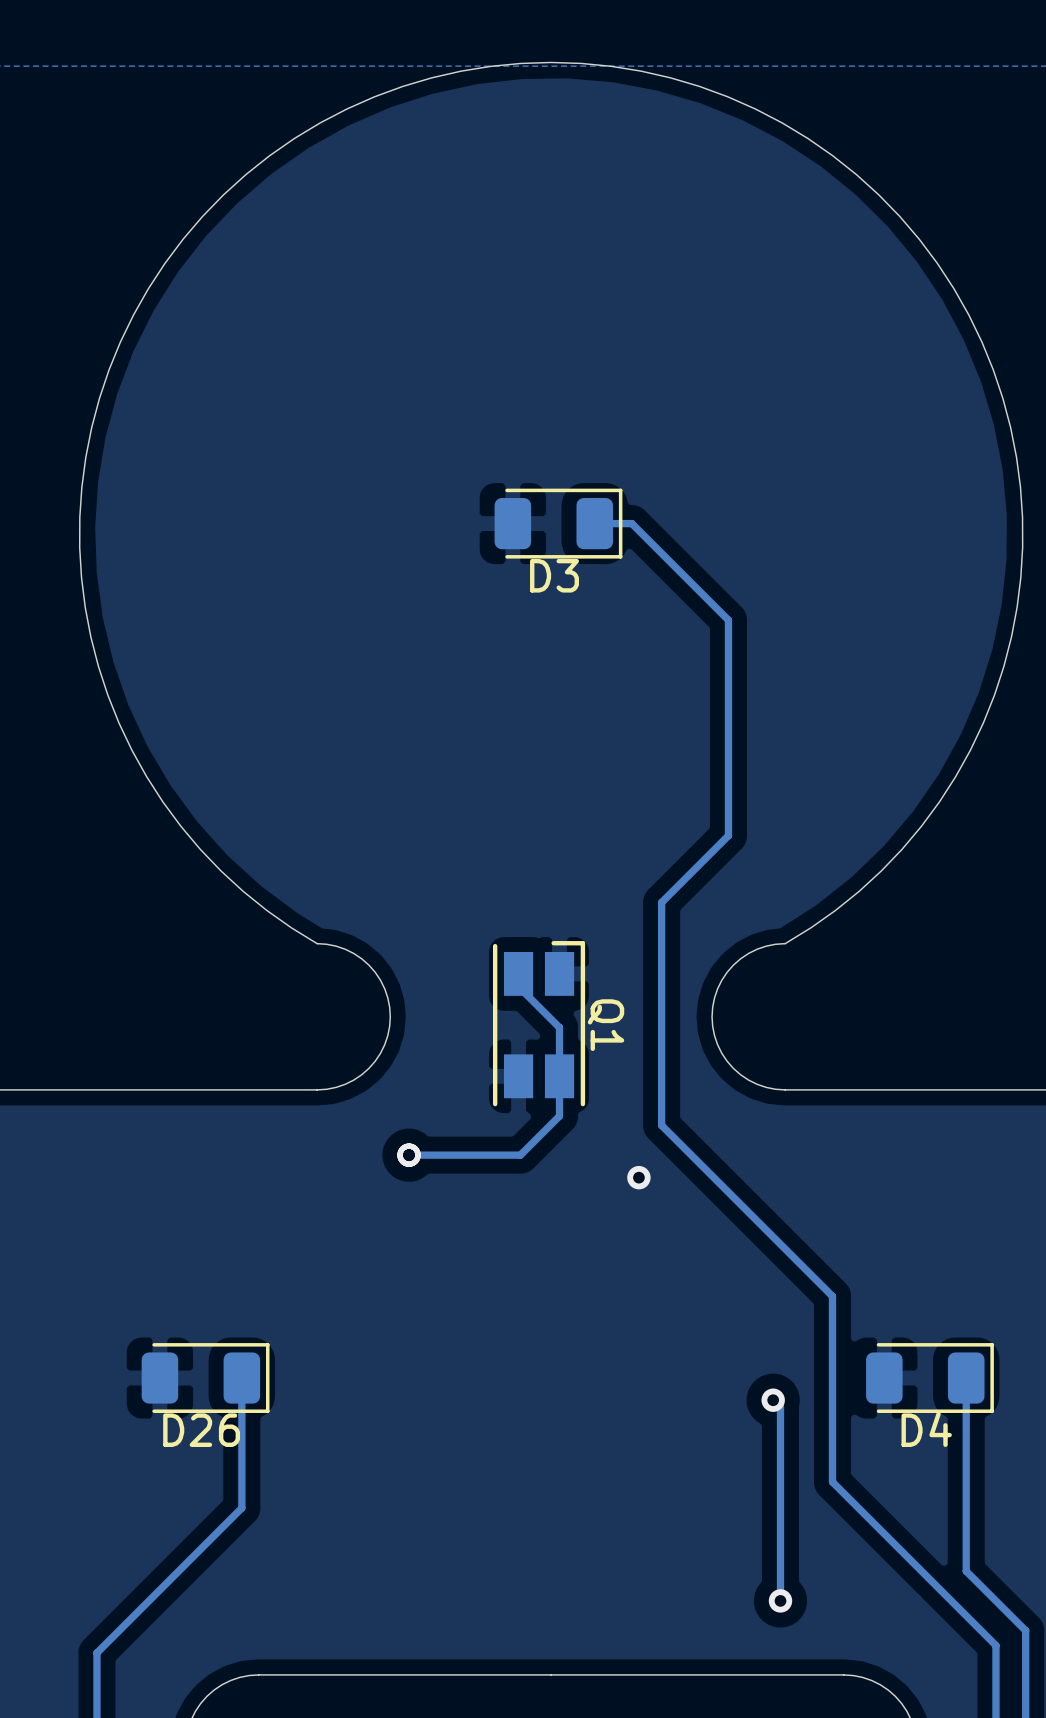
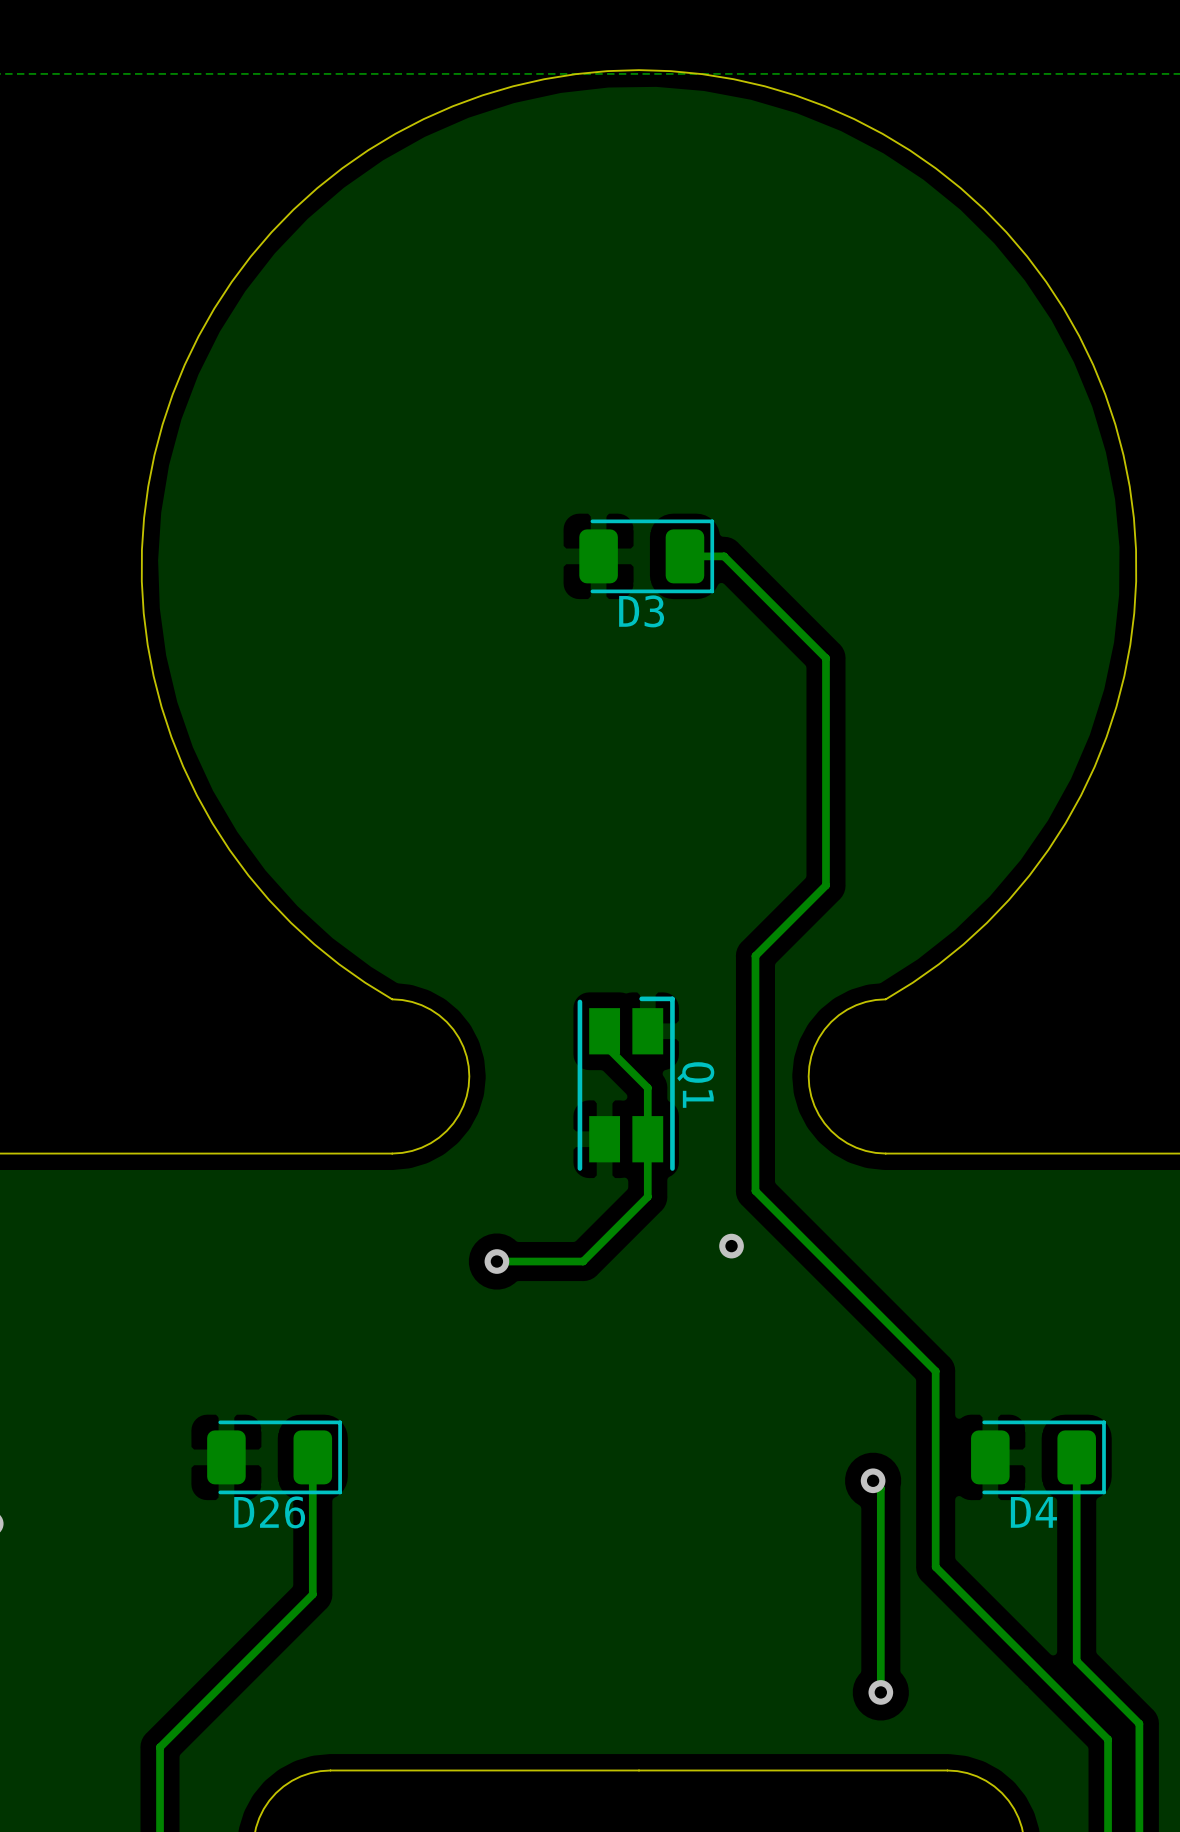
track: (559, 1116) (520, 1155) (409, 1155) -> (647, 1181) (647, 1196) (583, 1261) (496, 1261)
via position: (409, 1155) -> (496, 1261)

